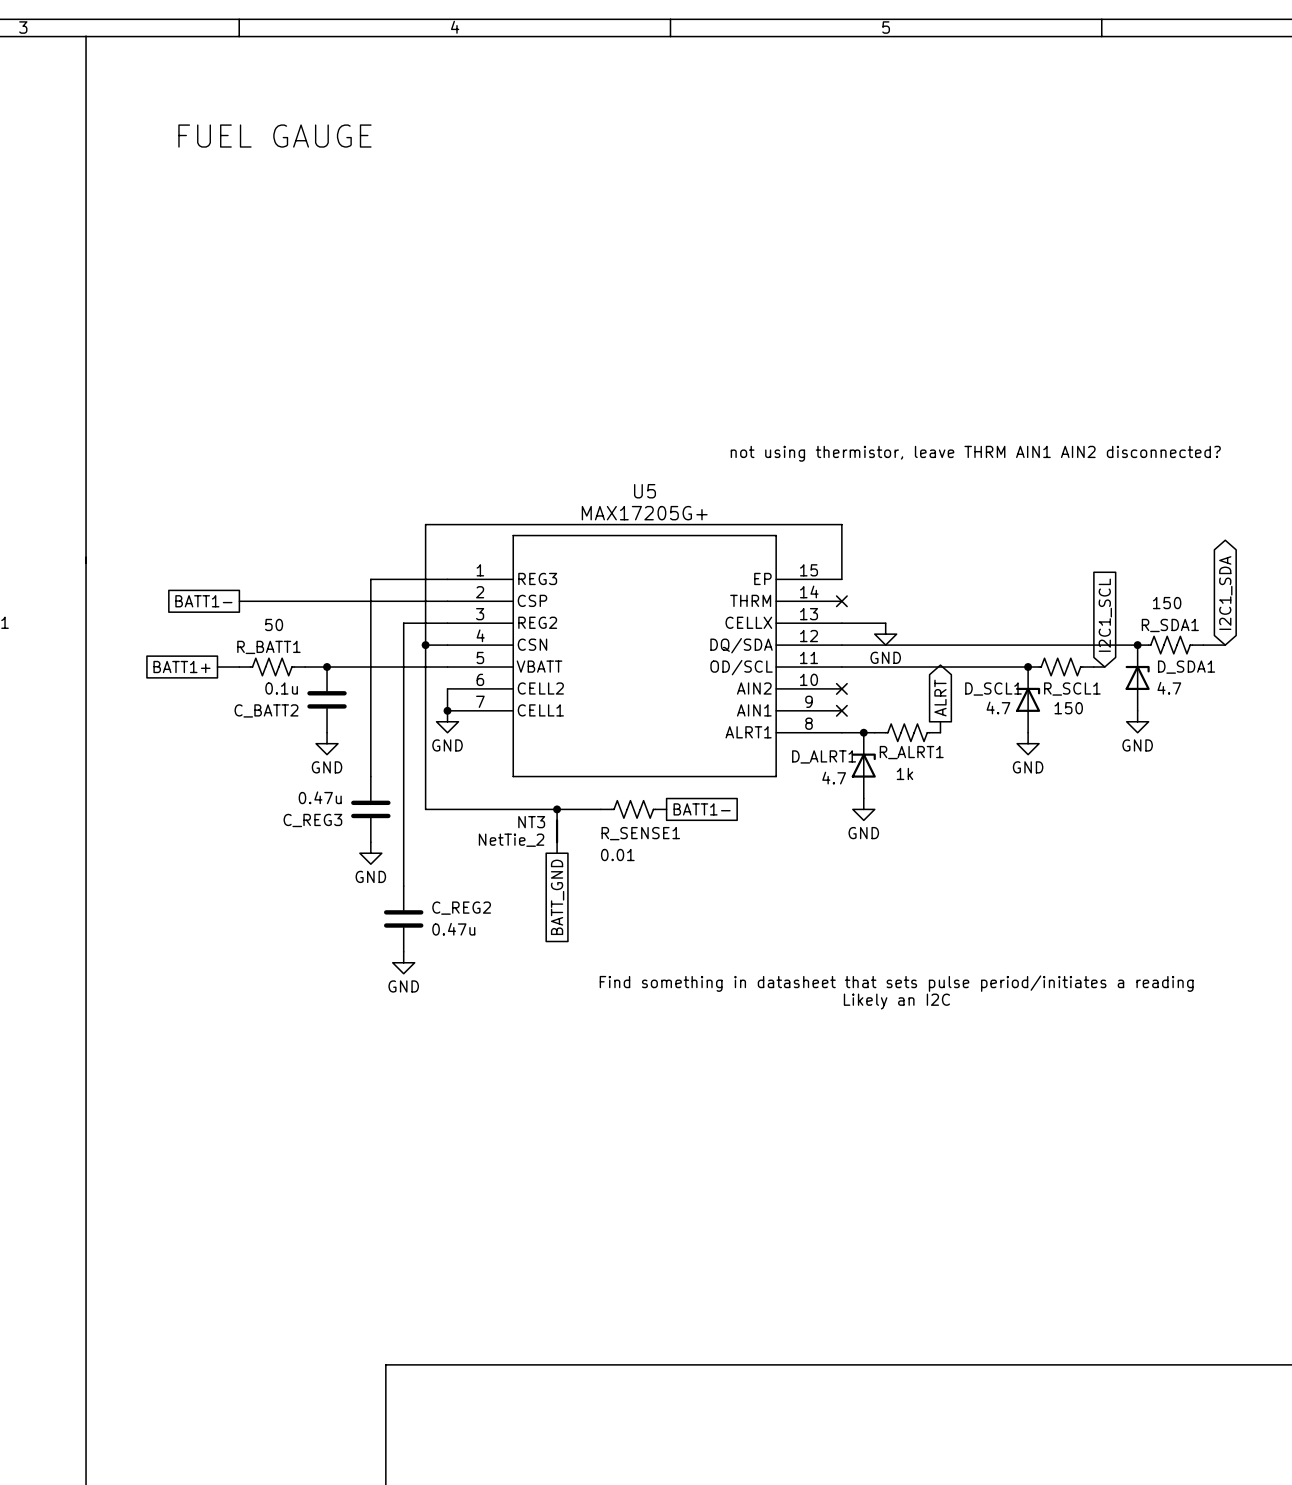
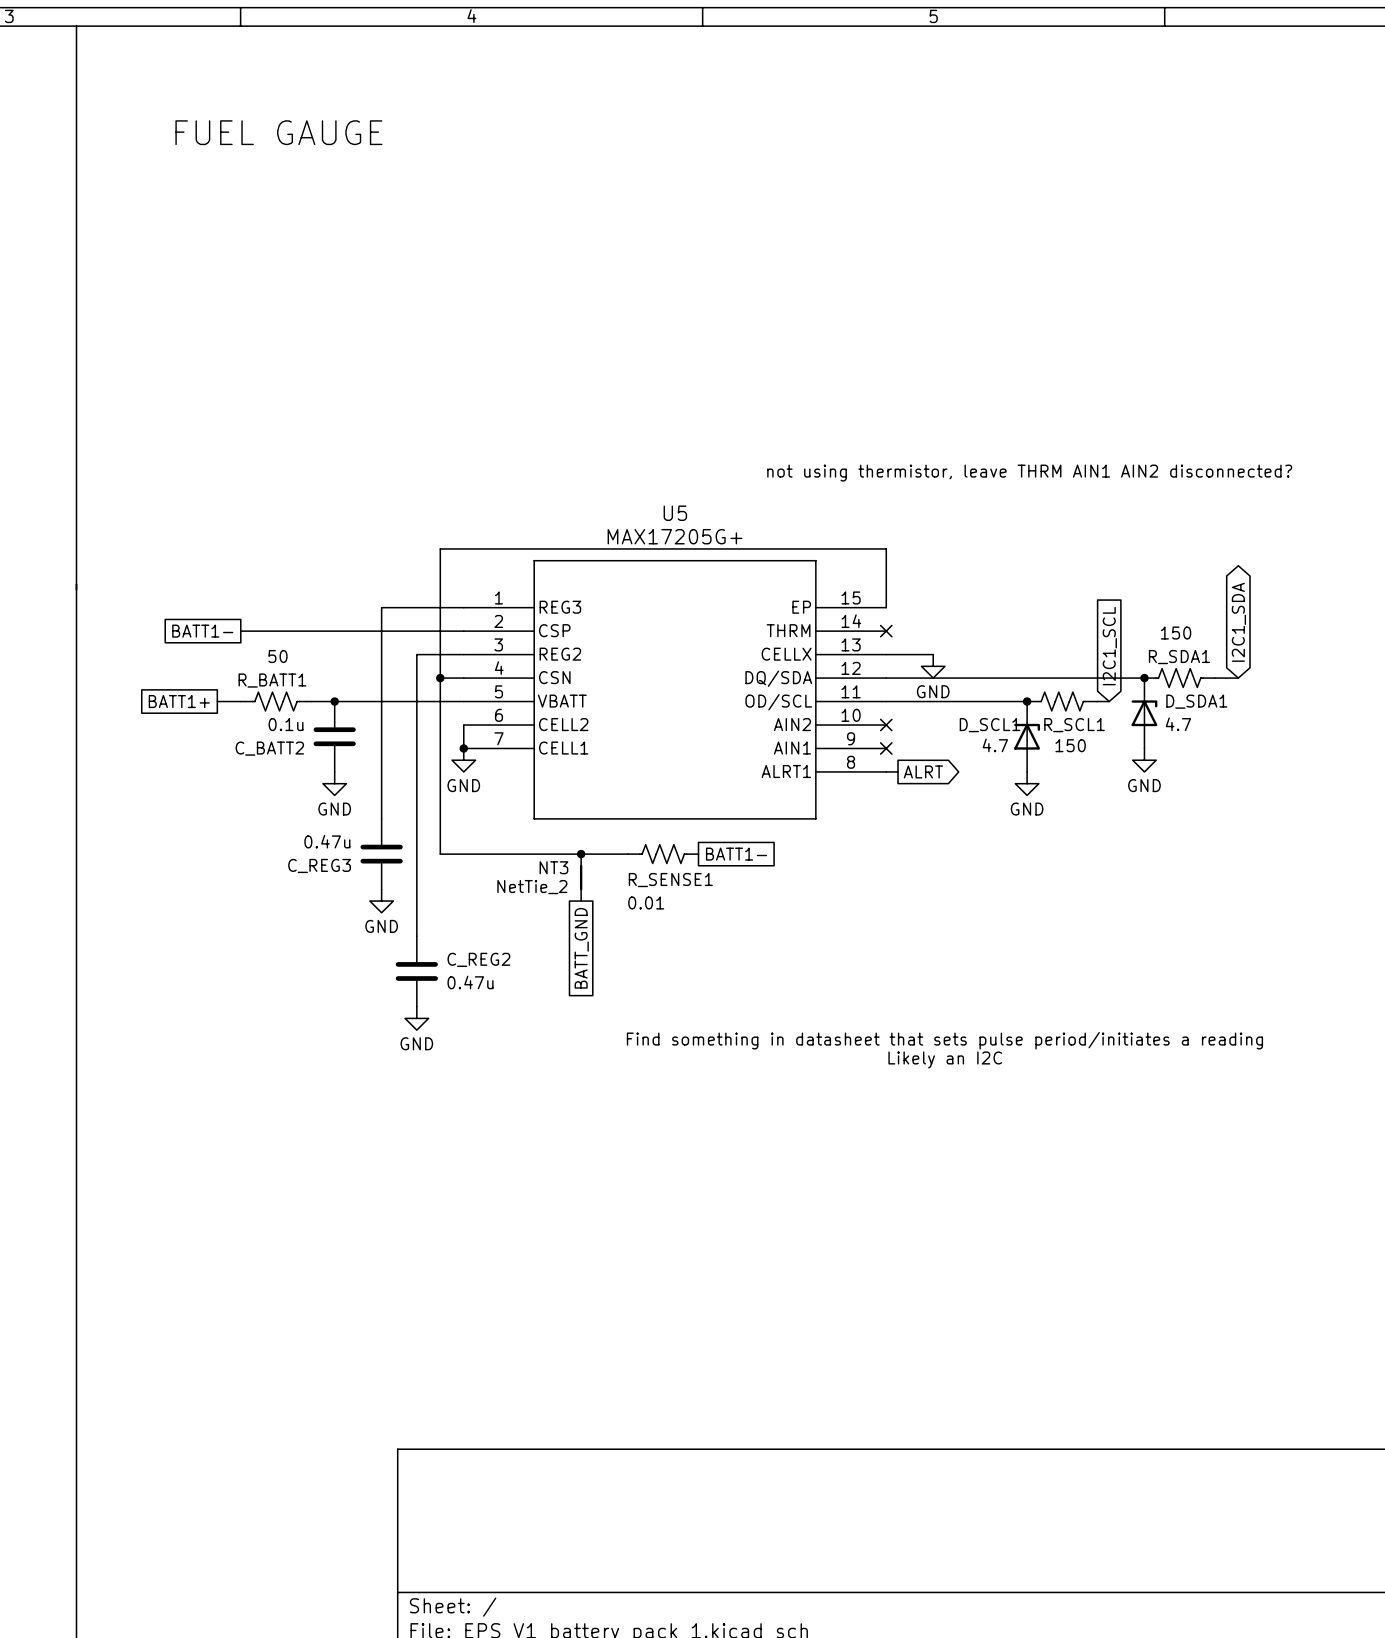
global label position: I2C1_SDA (1225, 593) -> I2C1_SDA (1238, 622)
global label position: I2C1_SCL (1105, 615) -> I2C1_SCL (1109, 646)
wire: (1082, 645) (1137, 645) -> none
junction: none -> (1144, 678)
junction: (1137, 645) -> none
R_SDA1 position: (1170, 645) -> (1179, 678)
wire: (1203, 645) (1225, 645) -> (1214, 678) (1238, 678)
wire: (973, 667) (1028, 667) -> none
junction: none -> (1027, 701)
junction: (1028, 667) -> none
R_SCL1 position: (1060, 667) -> (1062, 701)
wire: (1093, 667) (1104, 667) -> (1097, 701) (1109, 701)
D_SDA1 position: (1137, 677) -> (1144, 713)
global label rotation: 0° (940, 698) -> 90° clockwise (923, 771)
D_SCL1 position: (1028, 699) -> (1027, 736)
wire: (940, 721) (940, 732) -> none
power symbol: none -> GND (1144, 760)
power symbol: GND (1137, 721) -> none
wire: (852, 732) (874, 732) -> none
junction: (863, 732) -> none
R_ALRT1: 1k (907, 732) -> none
power symbol: none -> GND (1027, 783)
power symbol: GND (1028, 743) -> none
D_ALRT1: 4.7 (863, 765) -> none
power symbol: GND (863, 809) -> none

